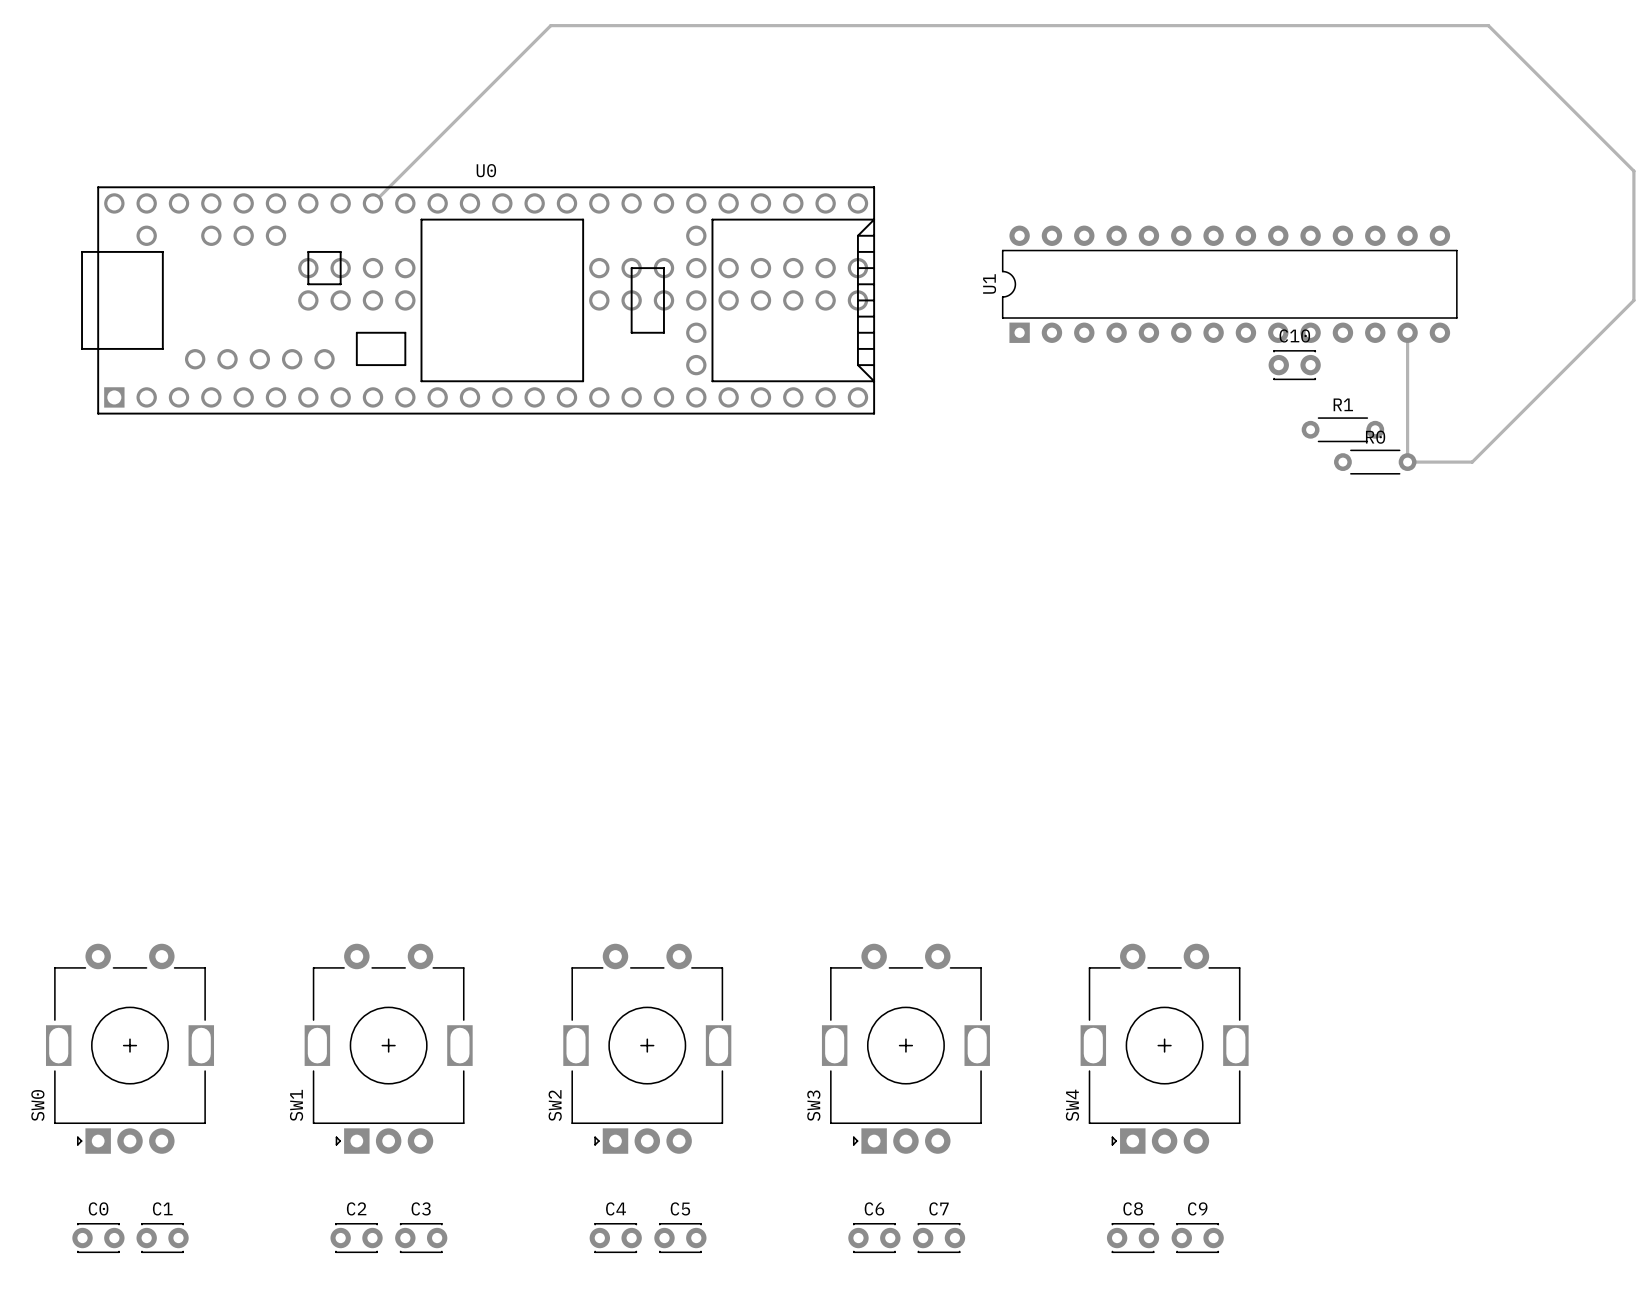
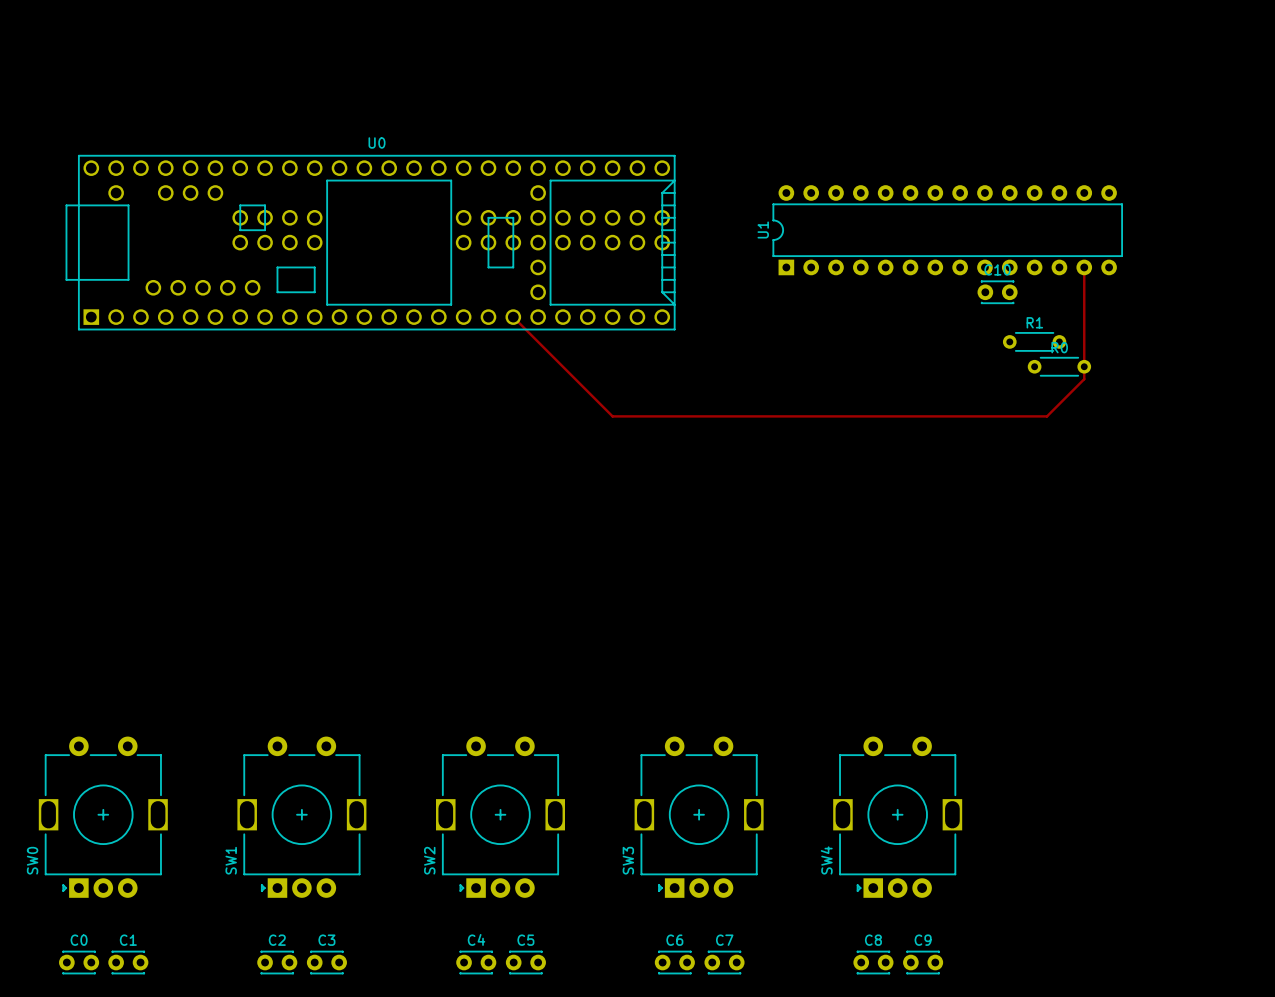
track: (372, 203) (550, 25) (1488, 25) (1633, 171) (1633, 300) (1472, 462) (1407, 462) -> (513, 317) (612, 416) (1047, 416) (1084, 379) (1084, 366)

